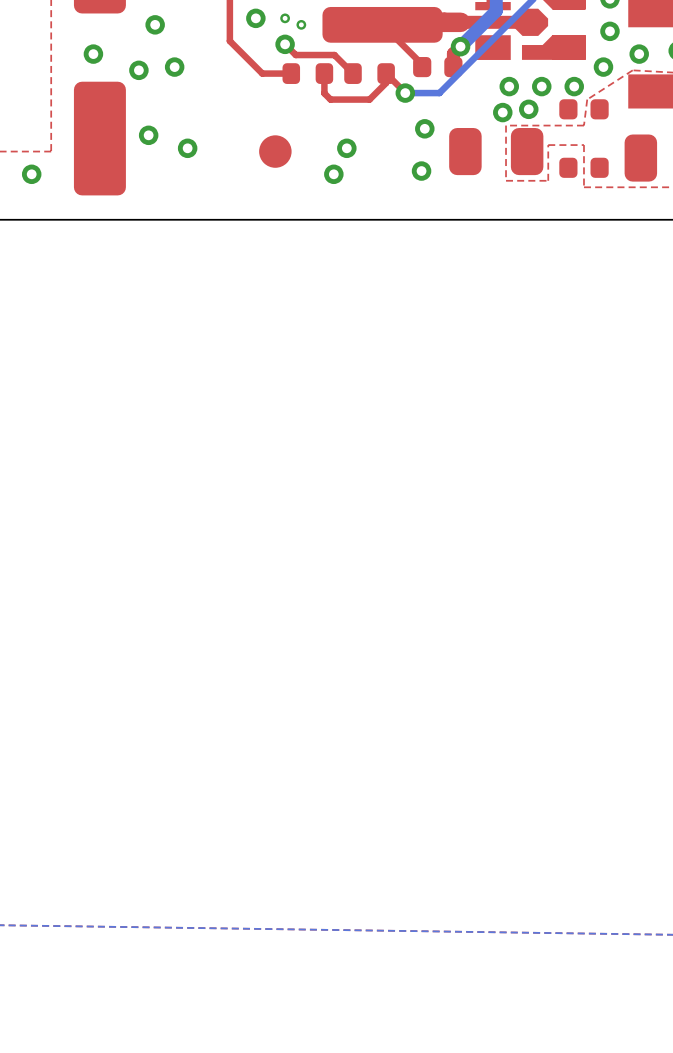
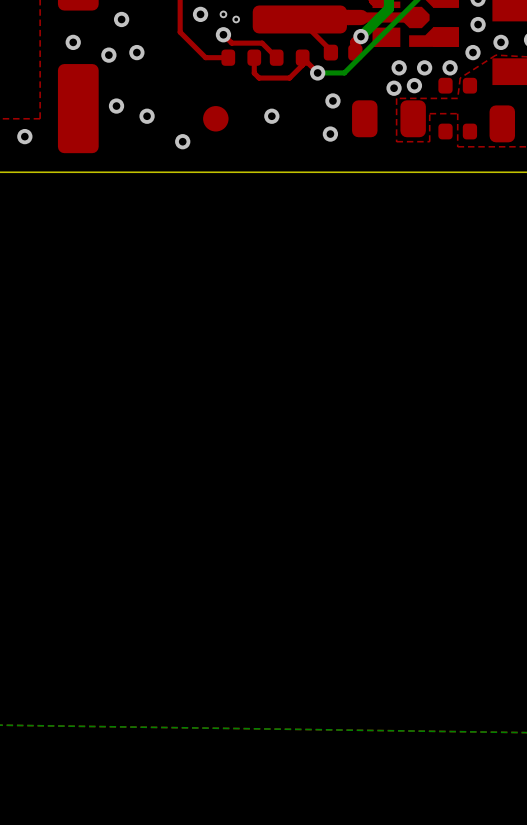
via position: (333, 174) -> (182, 141)

